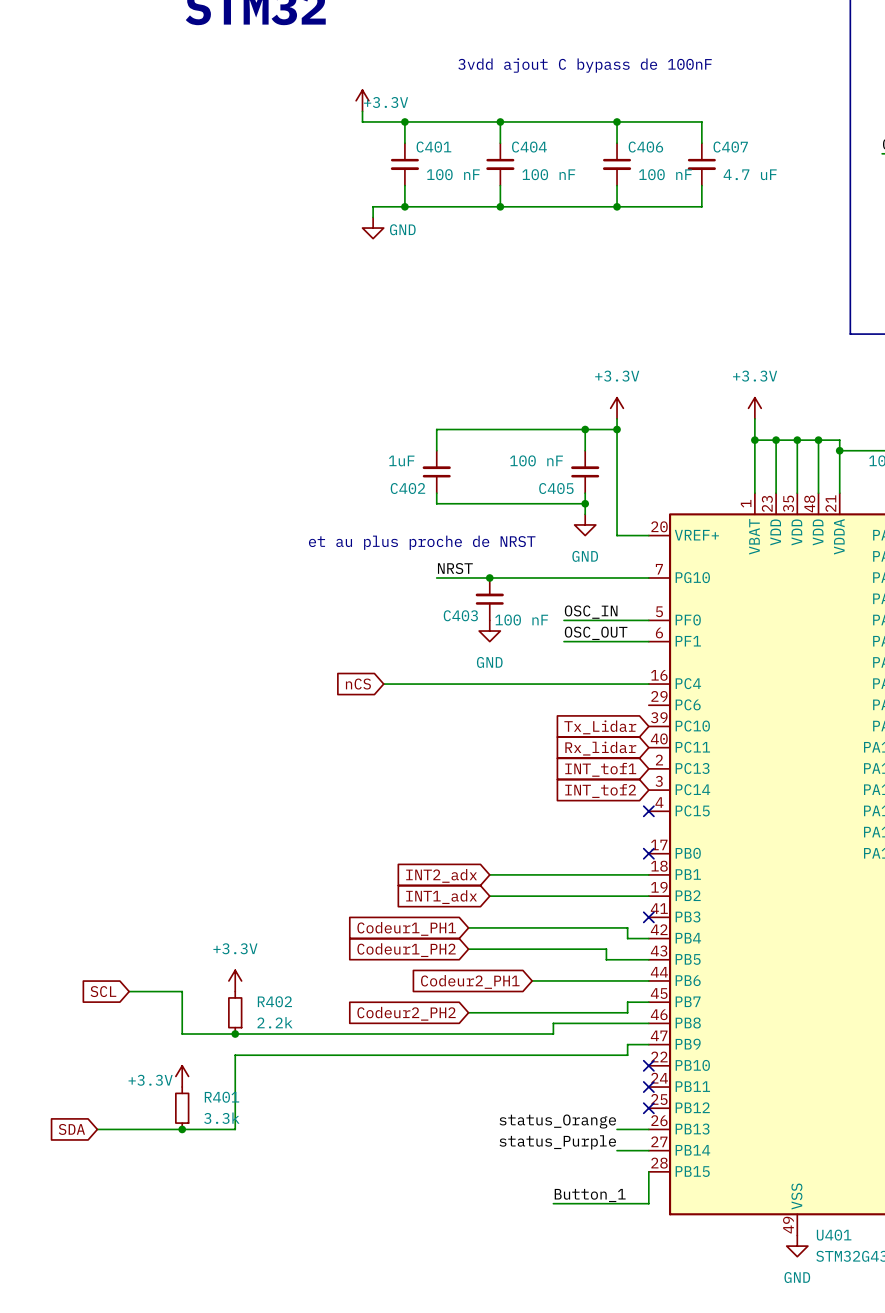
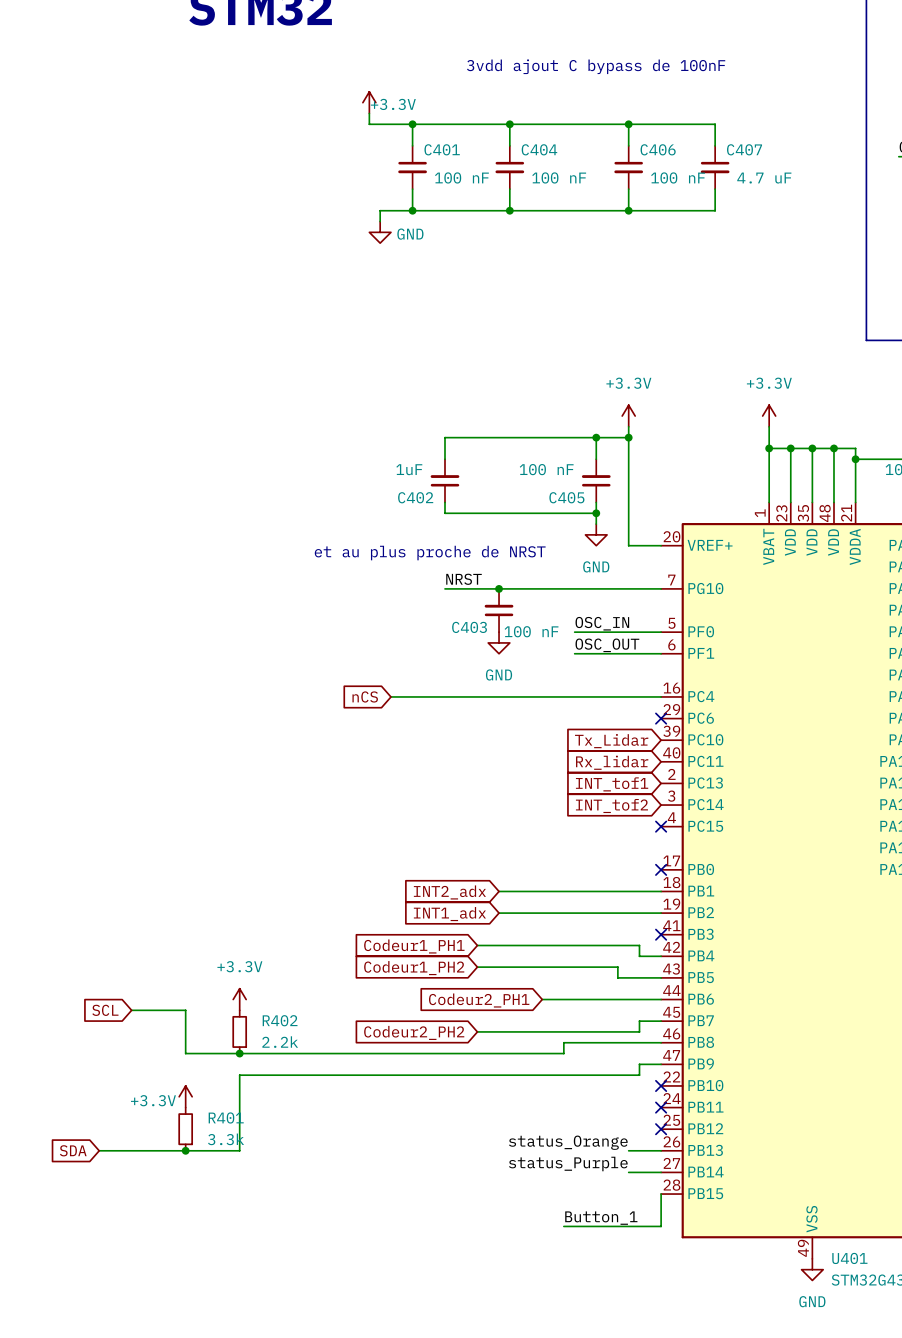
no-connect mark: none -> (661, 718)

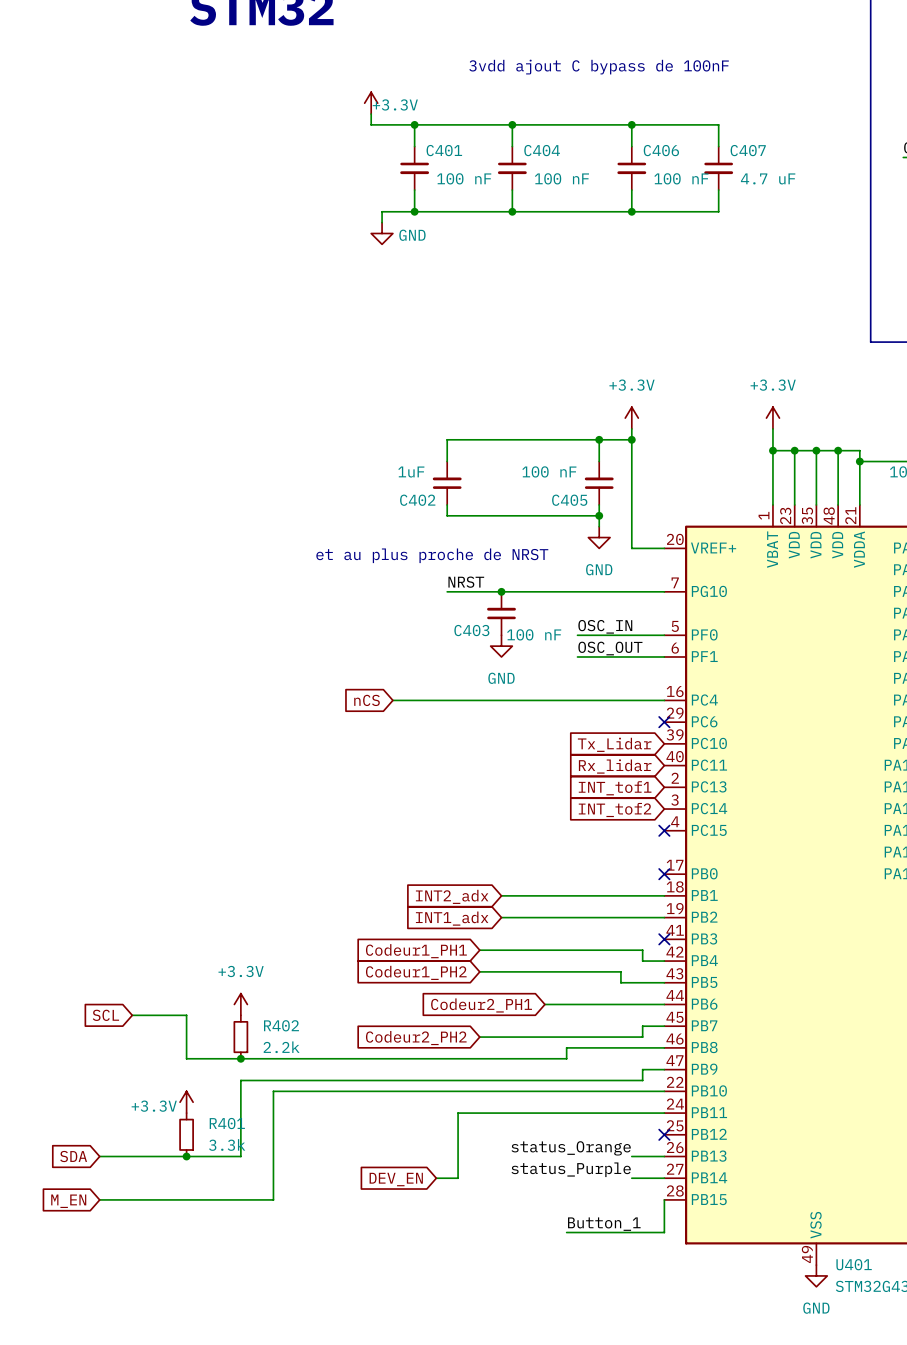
wire: none -> (664, 1091) (273, 1091) (273, 1199) (99, 1199)
no-connect mark: (661, 1085) -> none
wire: none -> (664, 1113) (458, 1113) (458, 1178) (436, 1178)
no-connect mark: (661, 1107) -> none
global label: none -> DEV_EN (396, 1179)
global label: none -> M_EN (68, 1201)

